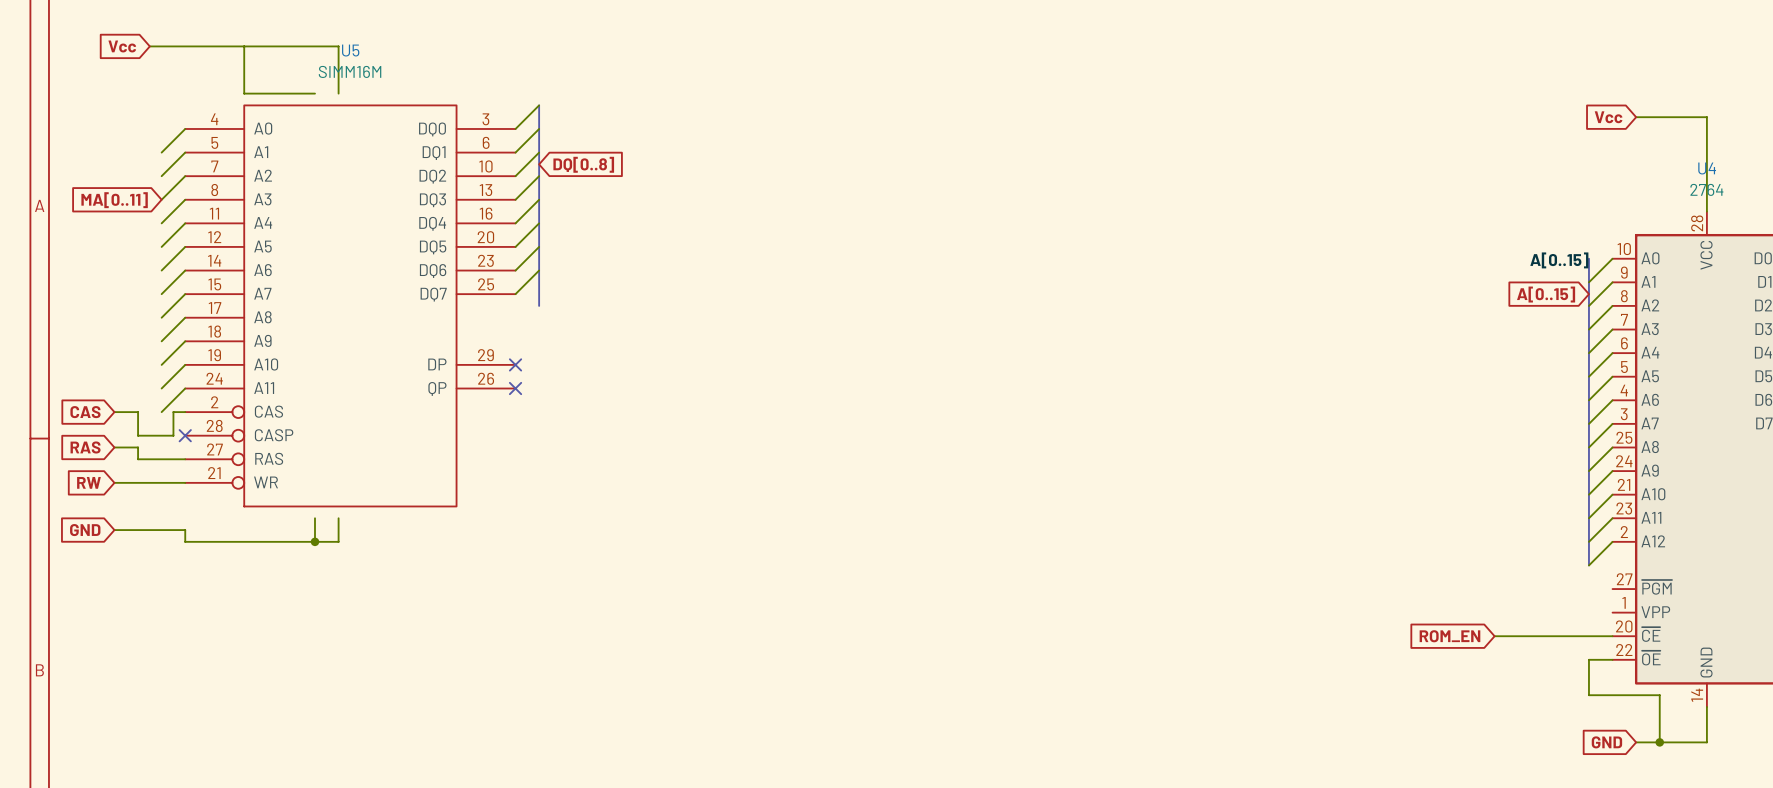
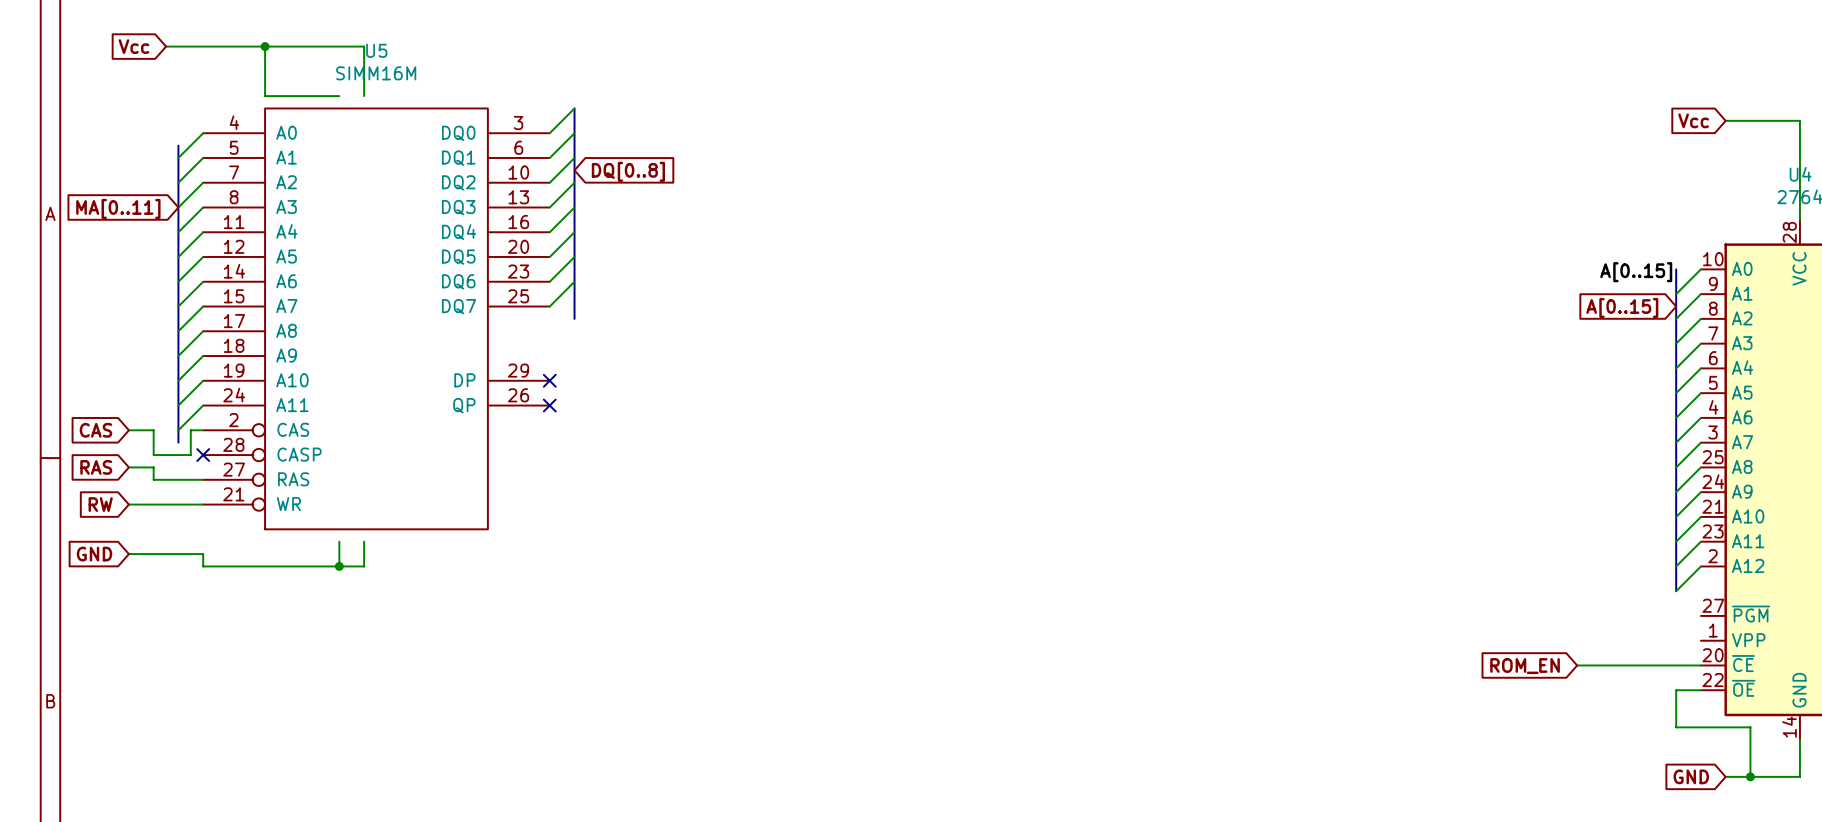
junction: none -> (265, 46)
bus: none -> (178, 145) (178, 442)

